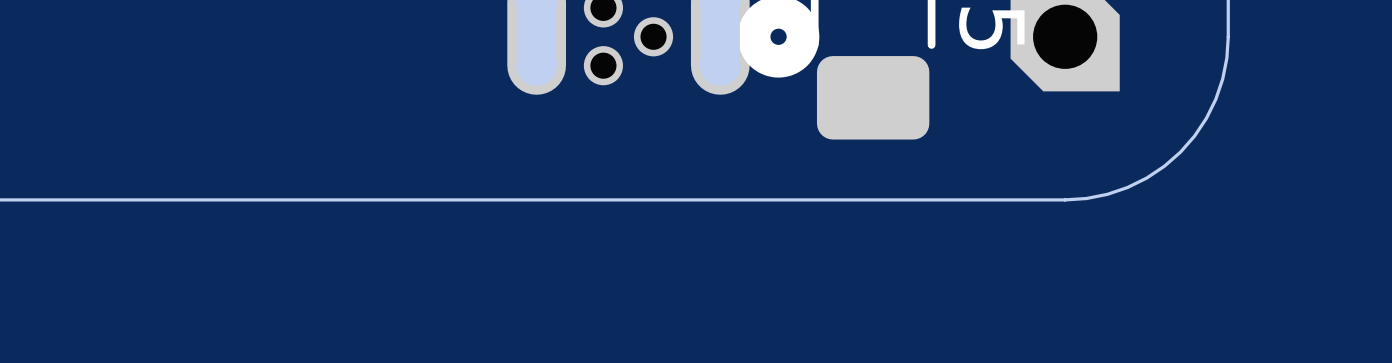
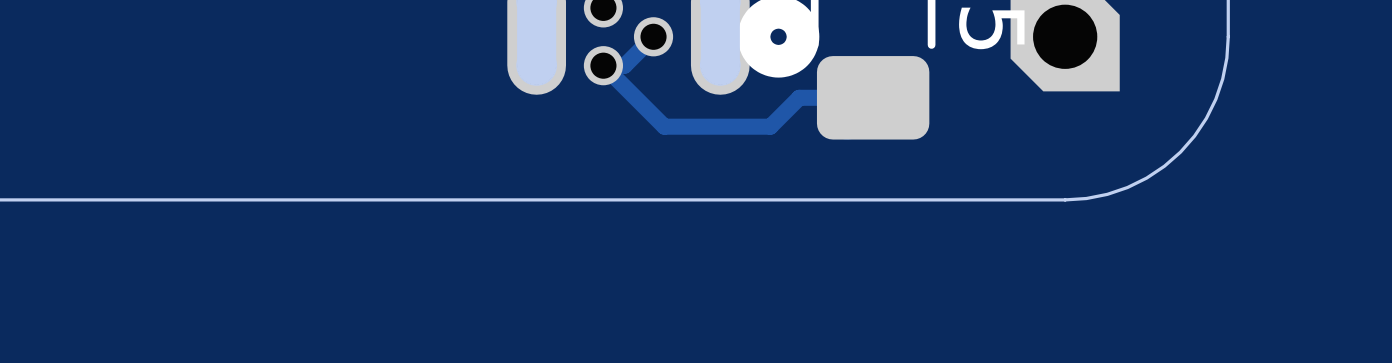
track: none -> (653, 36) (624, 65) (603, 65) (664, 126) (770, 126) (799, 97) (873, 97) (847, 123)

